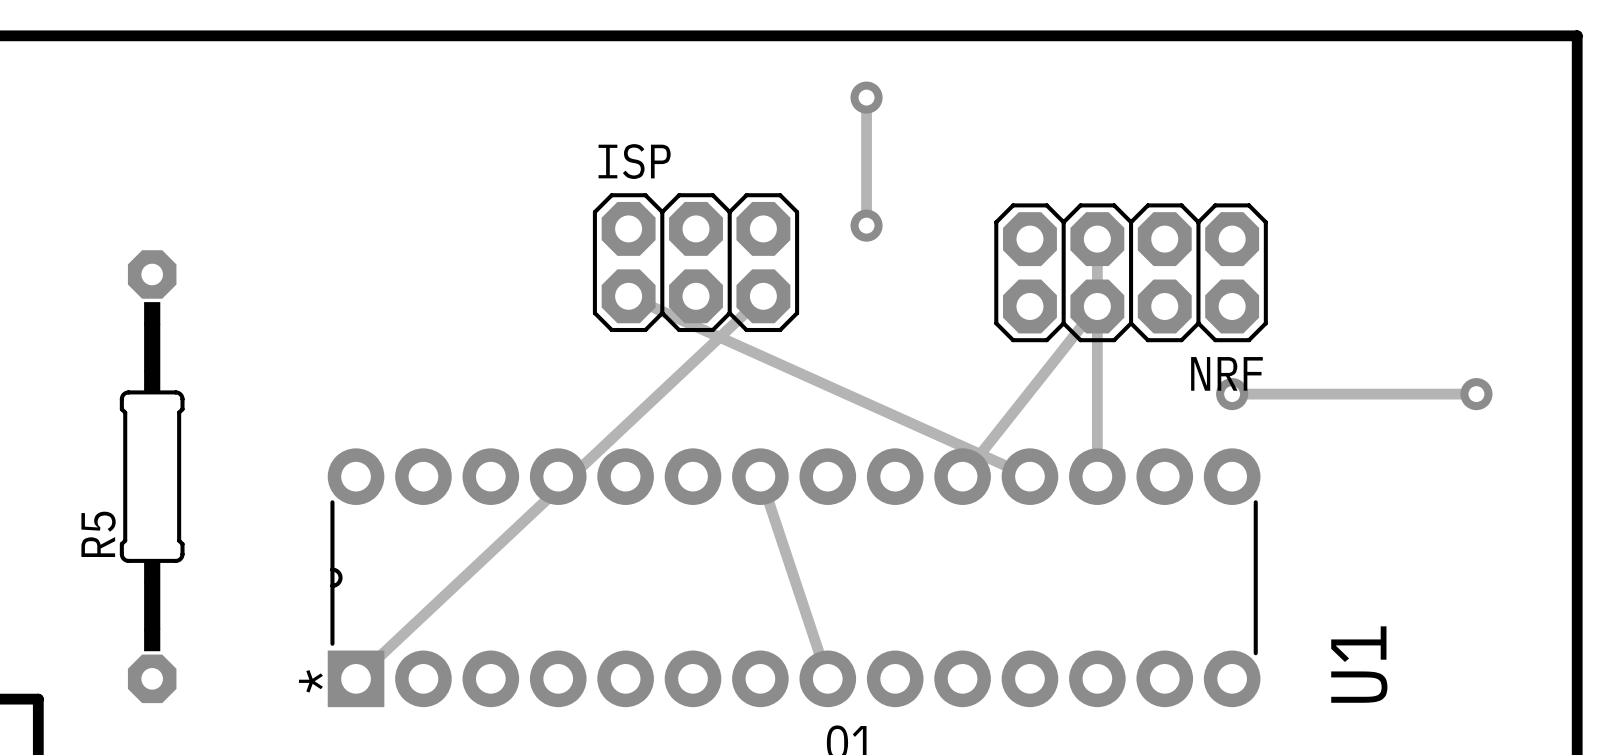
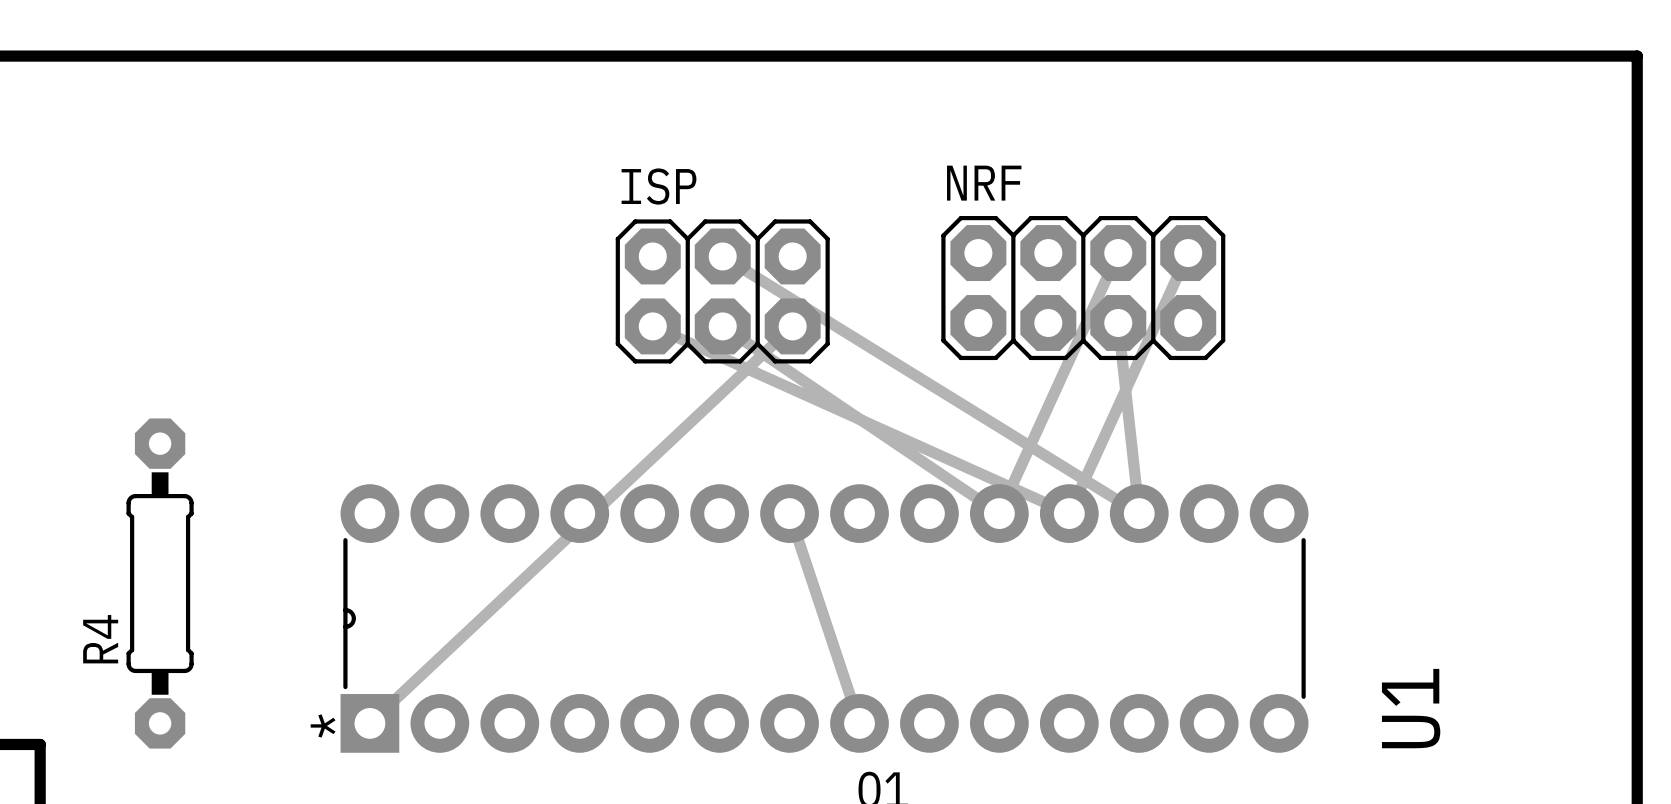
track: (866, 97) (866, 225) -> none
via: (866, 97) -> none
via: (866, 225) -> none
track: none -> (1118, 253) (999, 513) (722, 326)
track: none -> (1188, 253) (1069, 513)
track: none -> (722, 256) (1139, 513) (1118, 322)
track: (1097, 239) (1097, 476) -> none
NRF position: (1131, 272) -> (1083, 288)
track: (1097, 306) (962, 476) -> none
NRF name position: NRF (1226, 373) -> NRF (984, 183)
track: (1232, 394) (1476, 394) -> none
via: (1232, 394) -> none
via: (1476, 394) -> none
R5: (152, 476) -> none
R4: none -> (160, 583)

